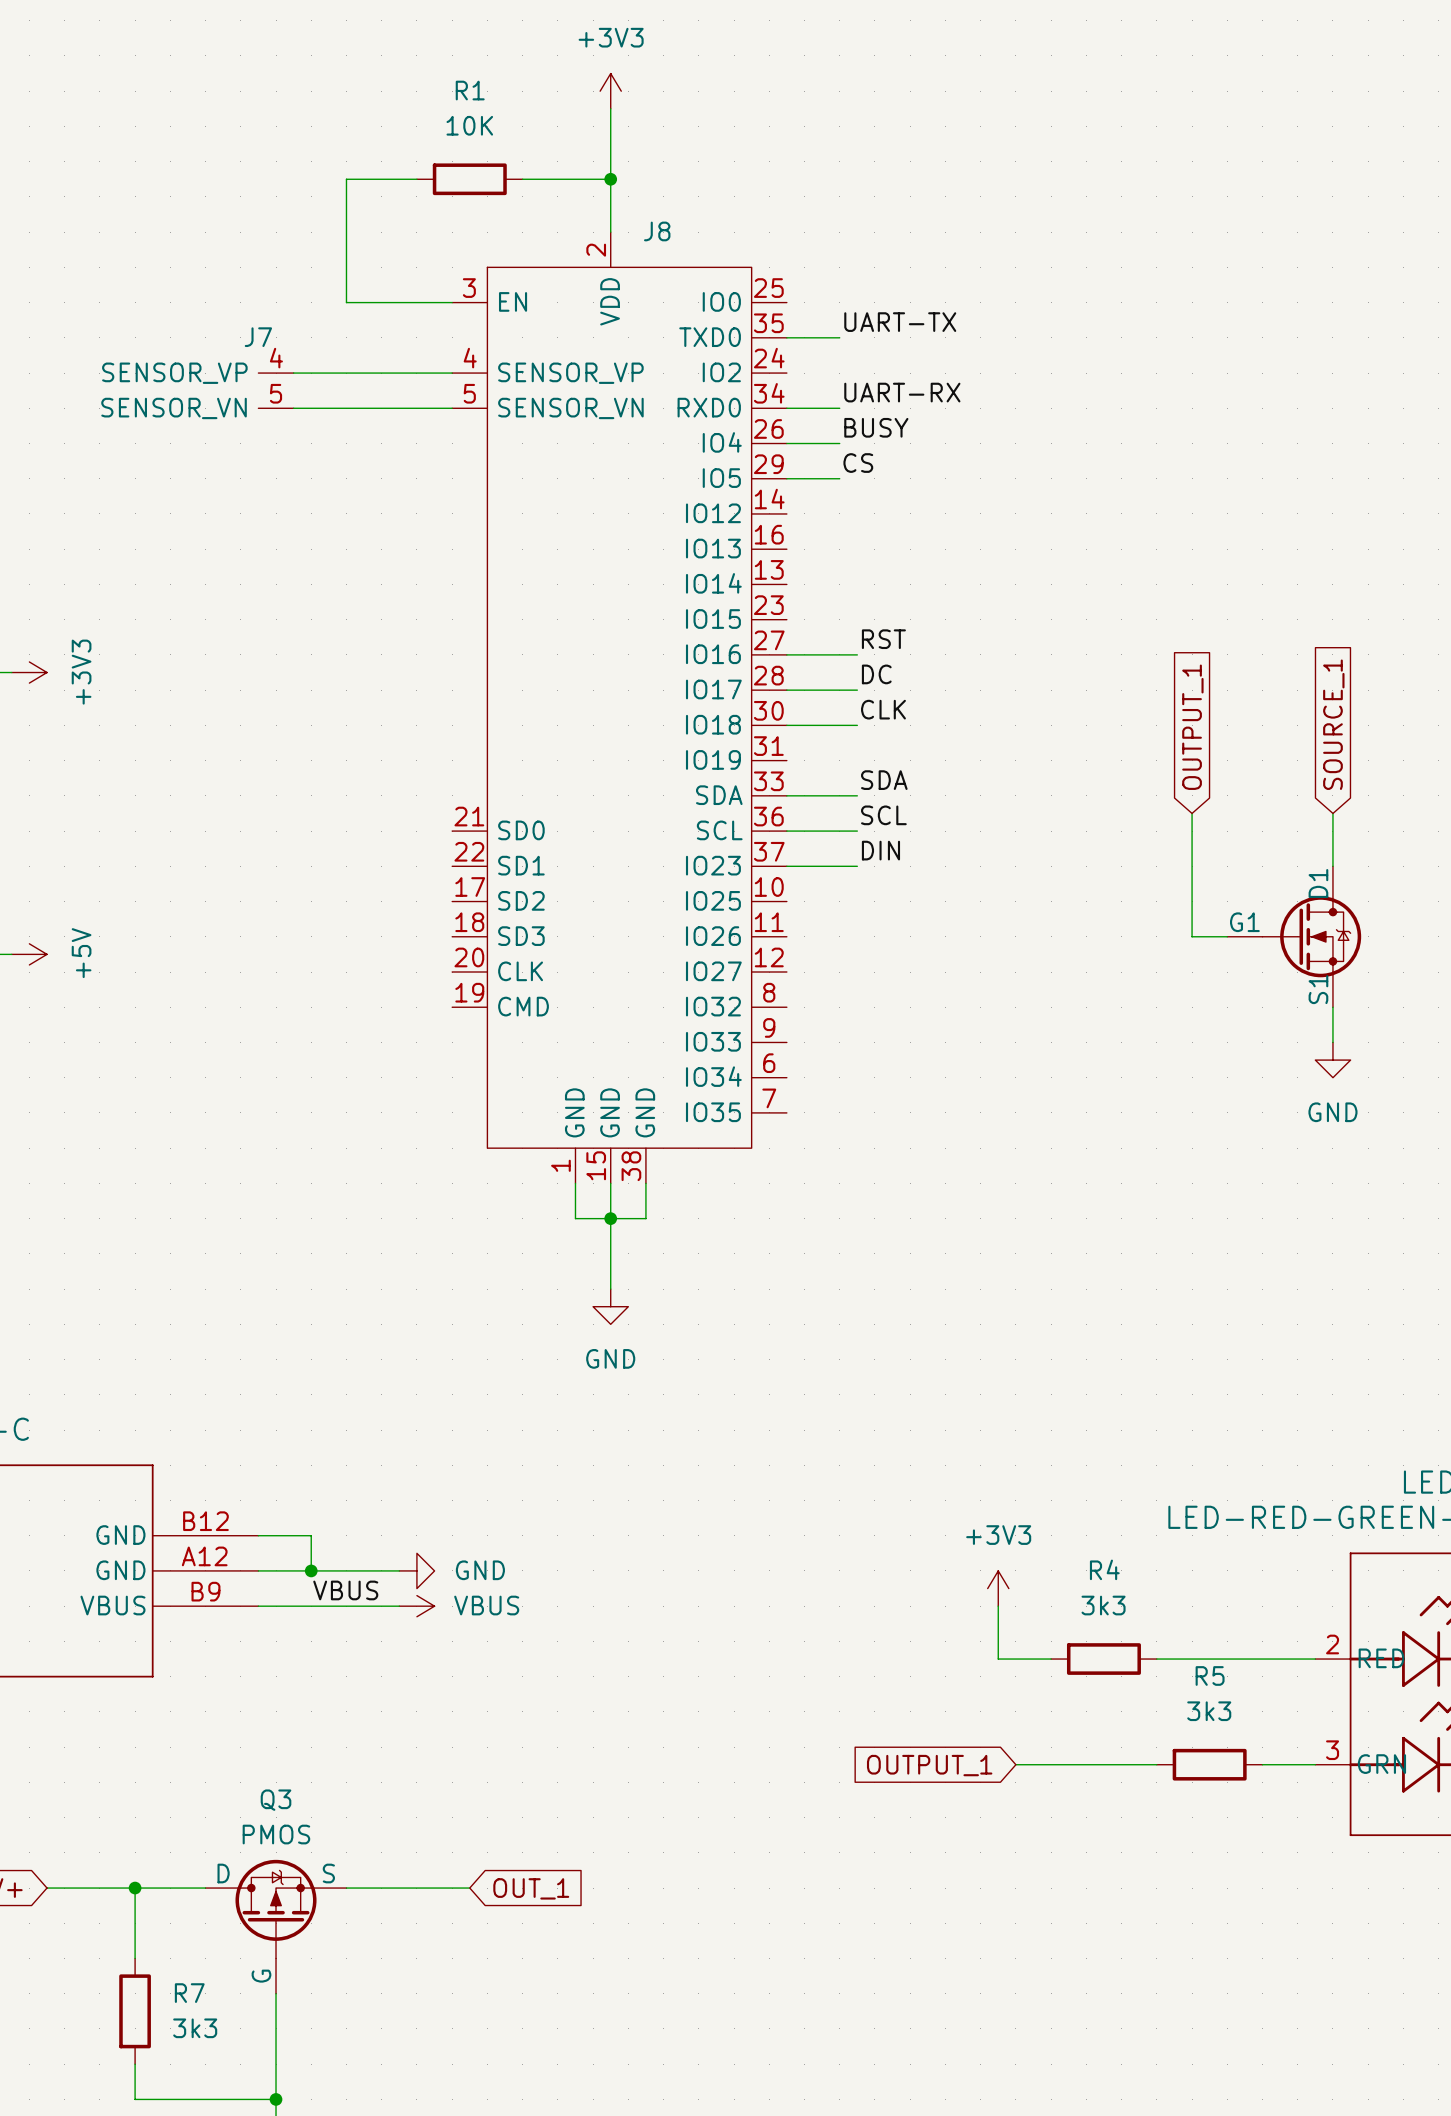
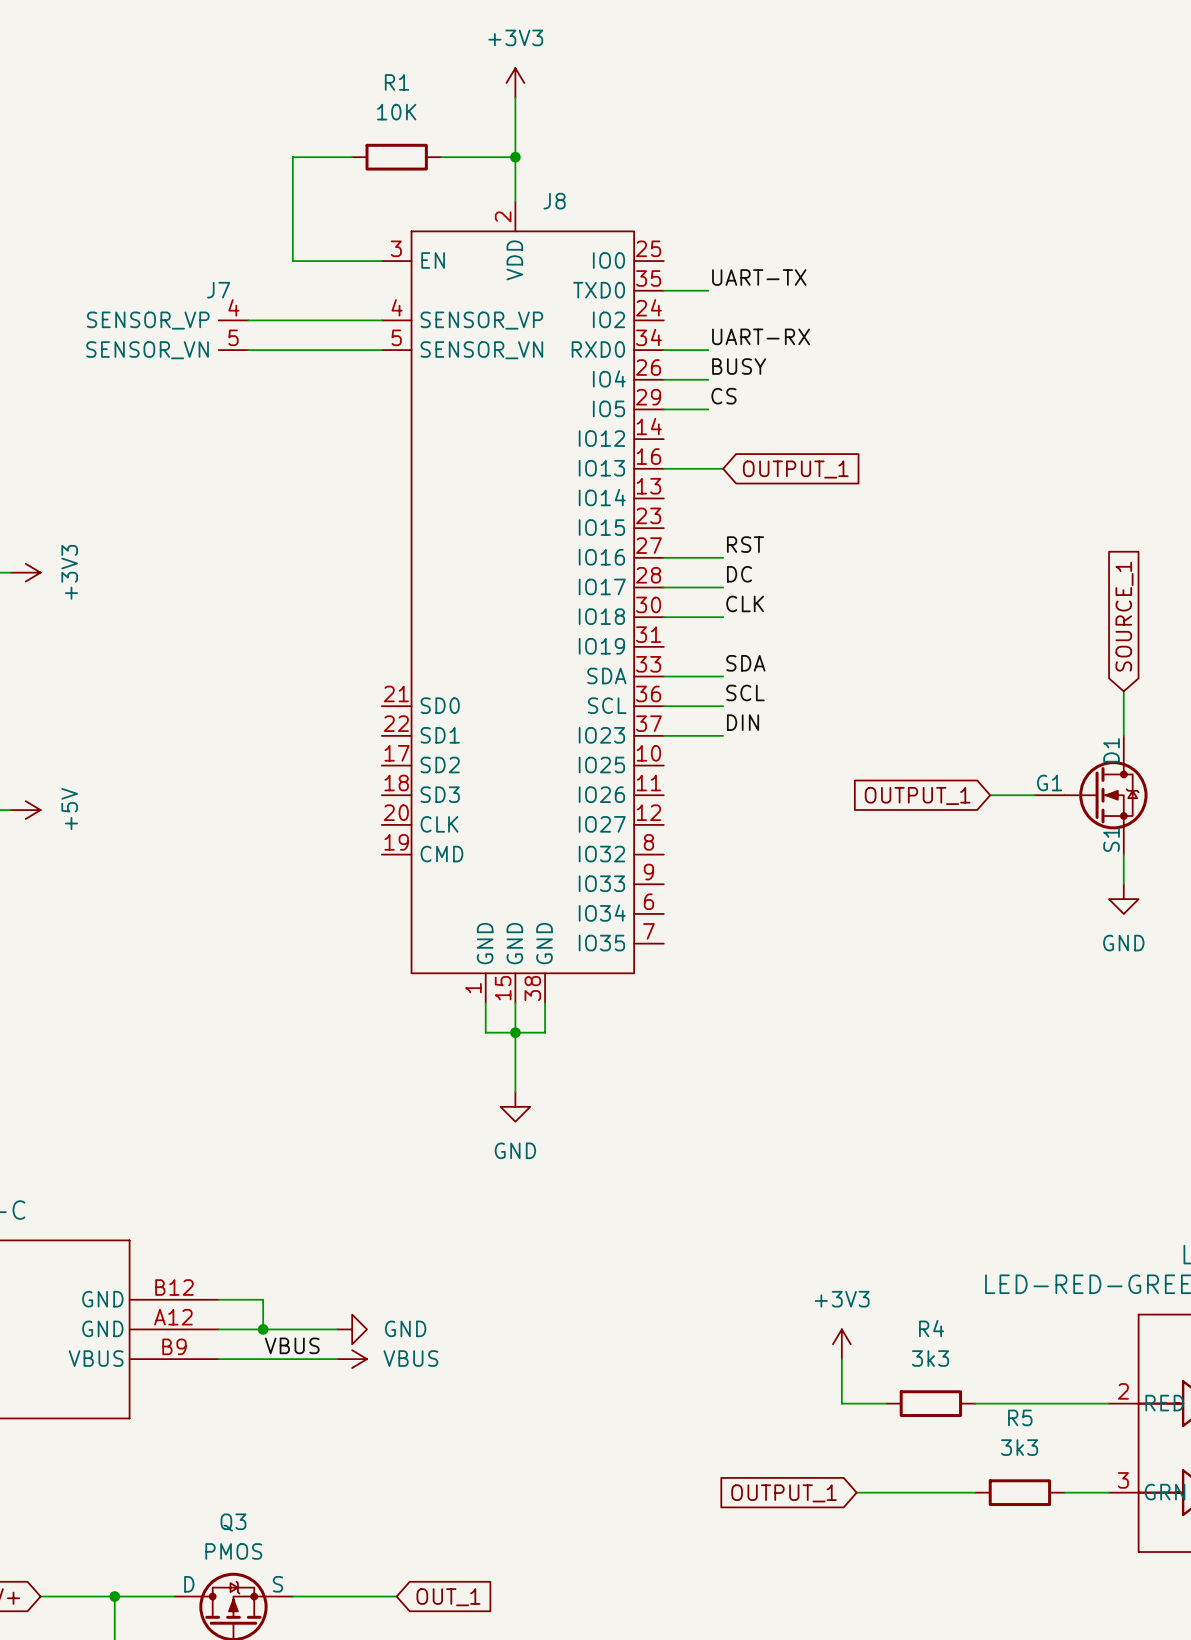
wire: none -> (663, 468) (723, 468)
global label: none -> OUTPUT_1 (795, 469)
global label rotation: 0° (1192, 727) -> 90° counterclockwise (917, 795)
global label position: OUTPUT_1 (1192, 727) -> OUTPUT_1 (917, 795)
wire: (1192, 813) (1192, 936) -> (990, 795) (1005, 795)

